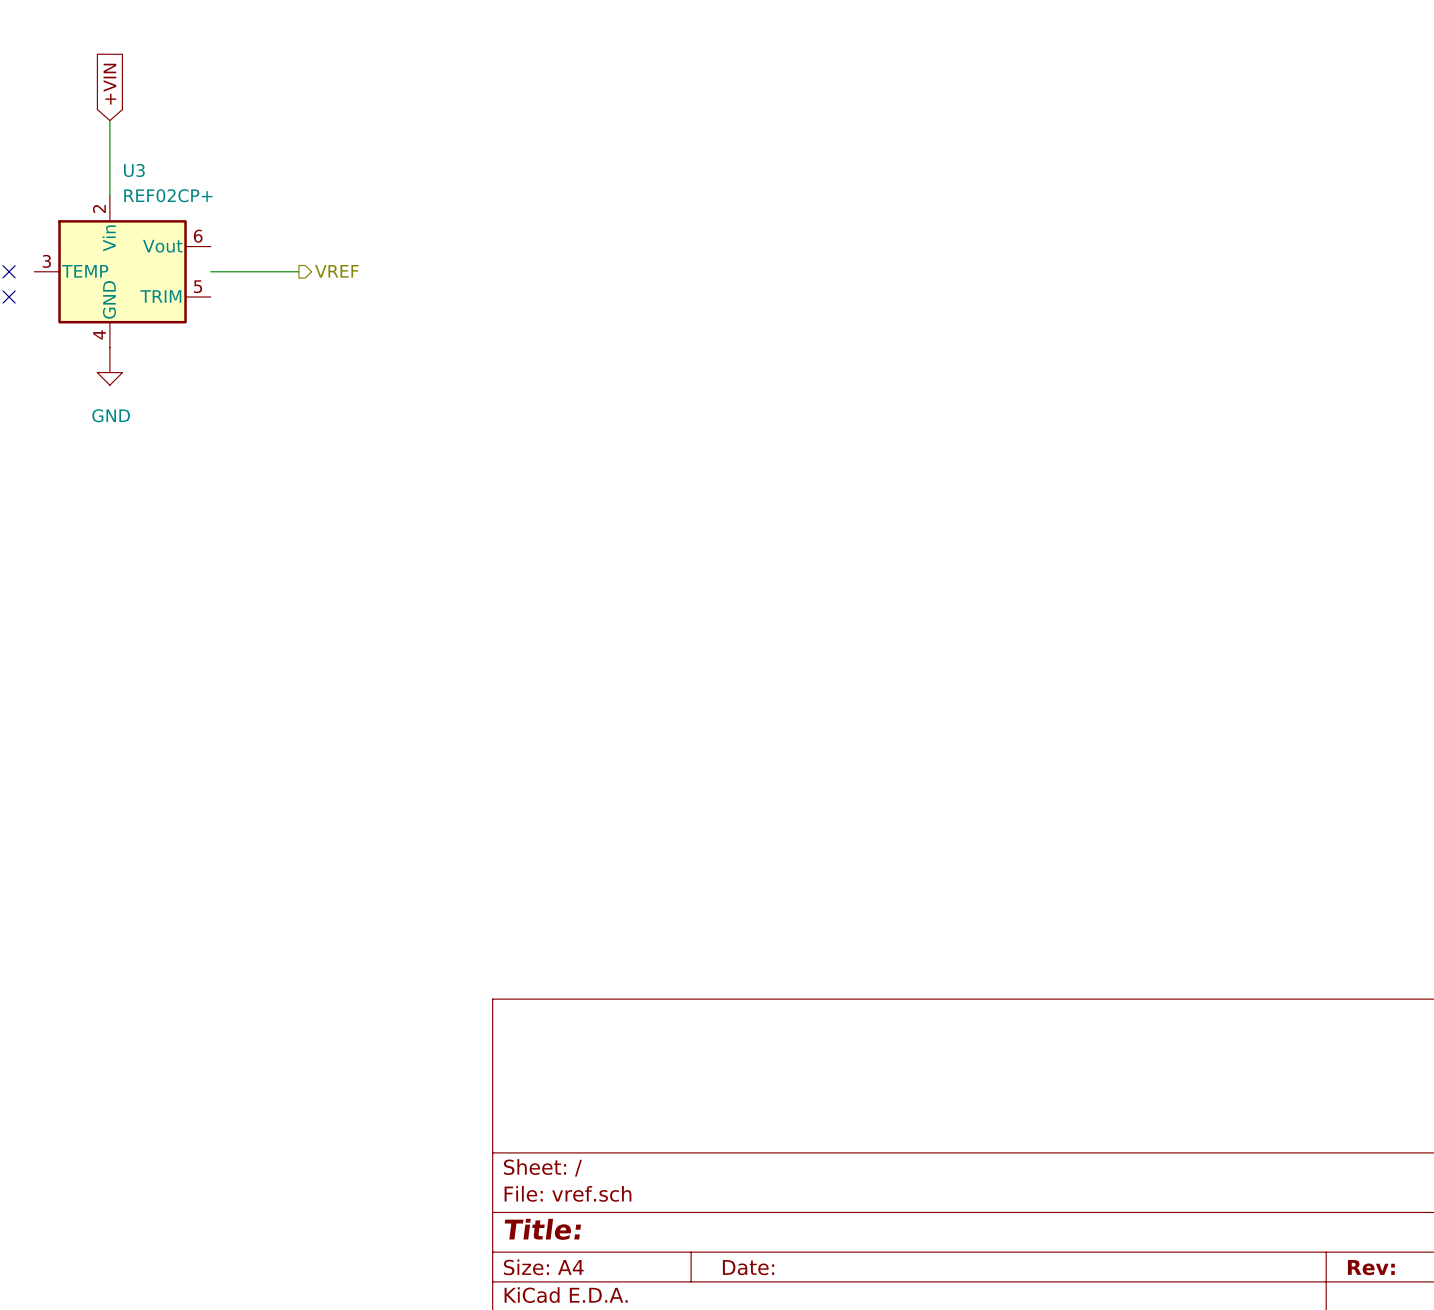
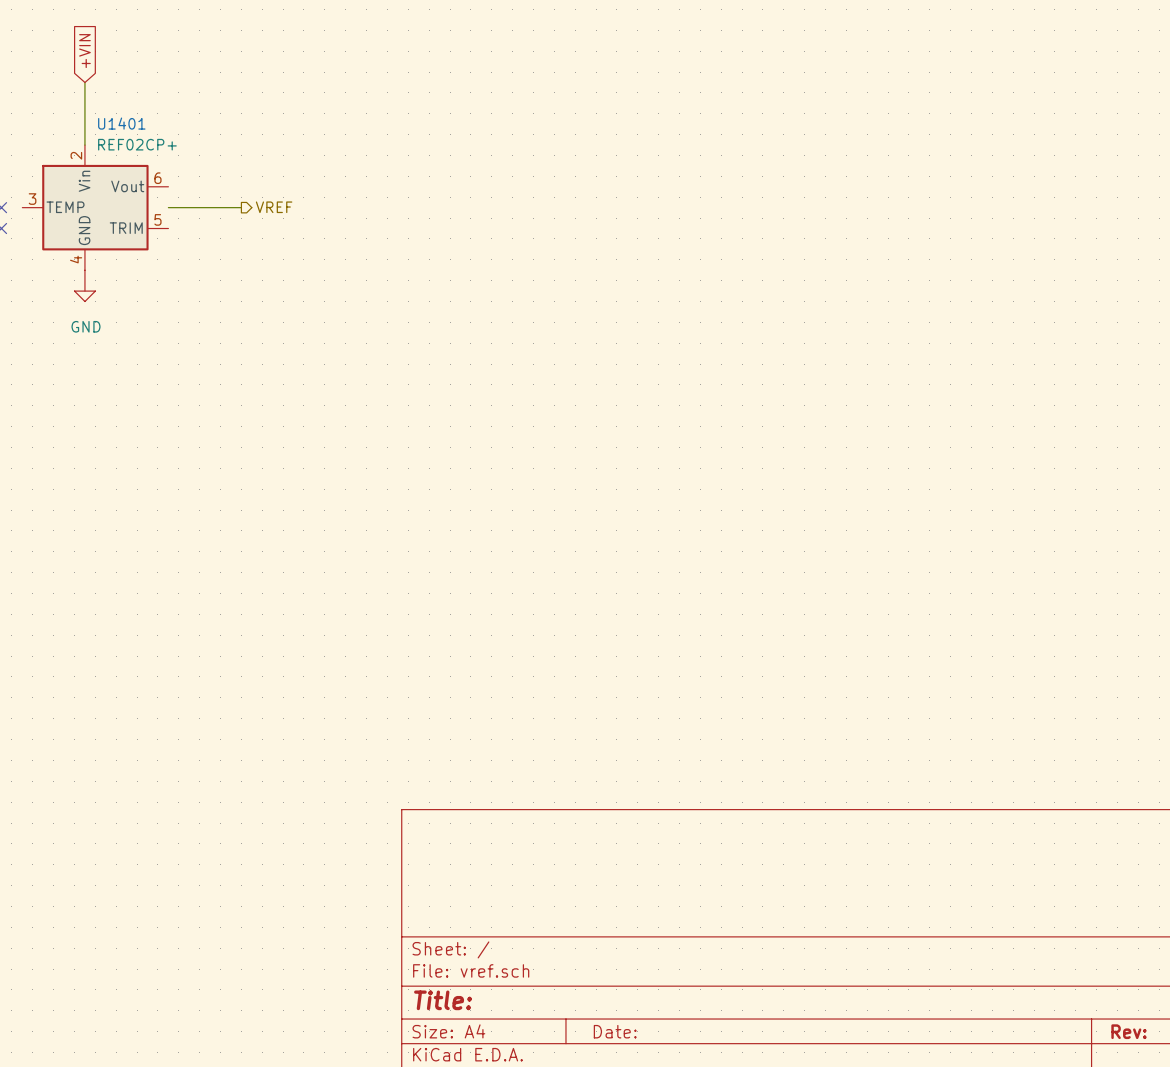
U3 name: U3 (134, 170) -> U1401 (121, 123)

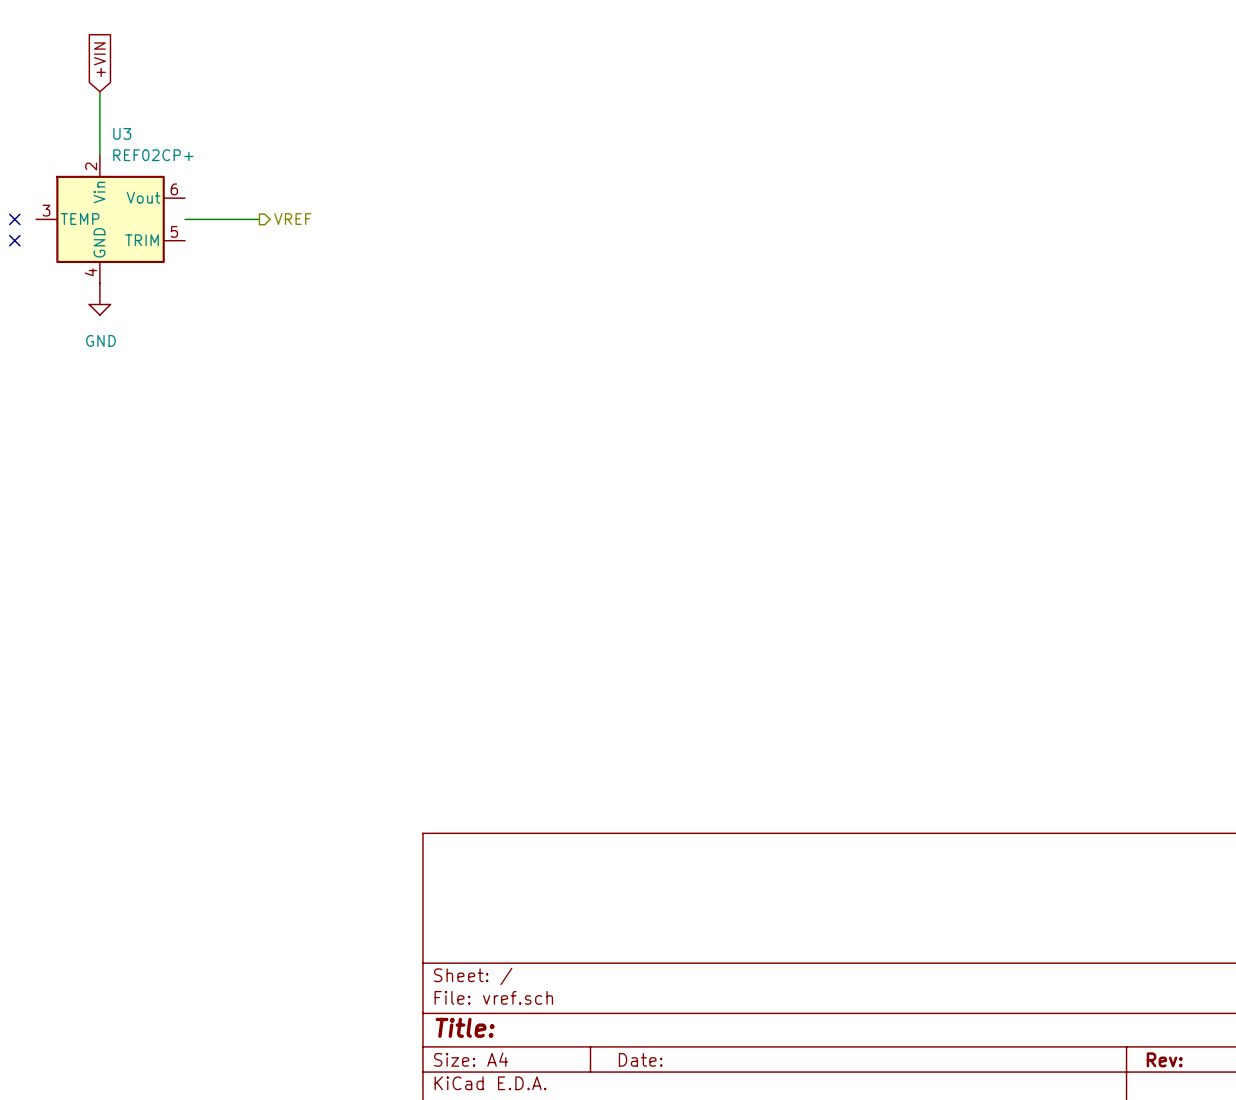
U1401 name: U1401 (121, 123) -> U3 (122, 133)

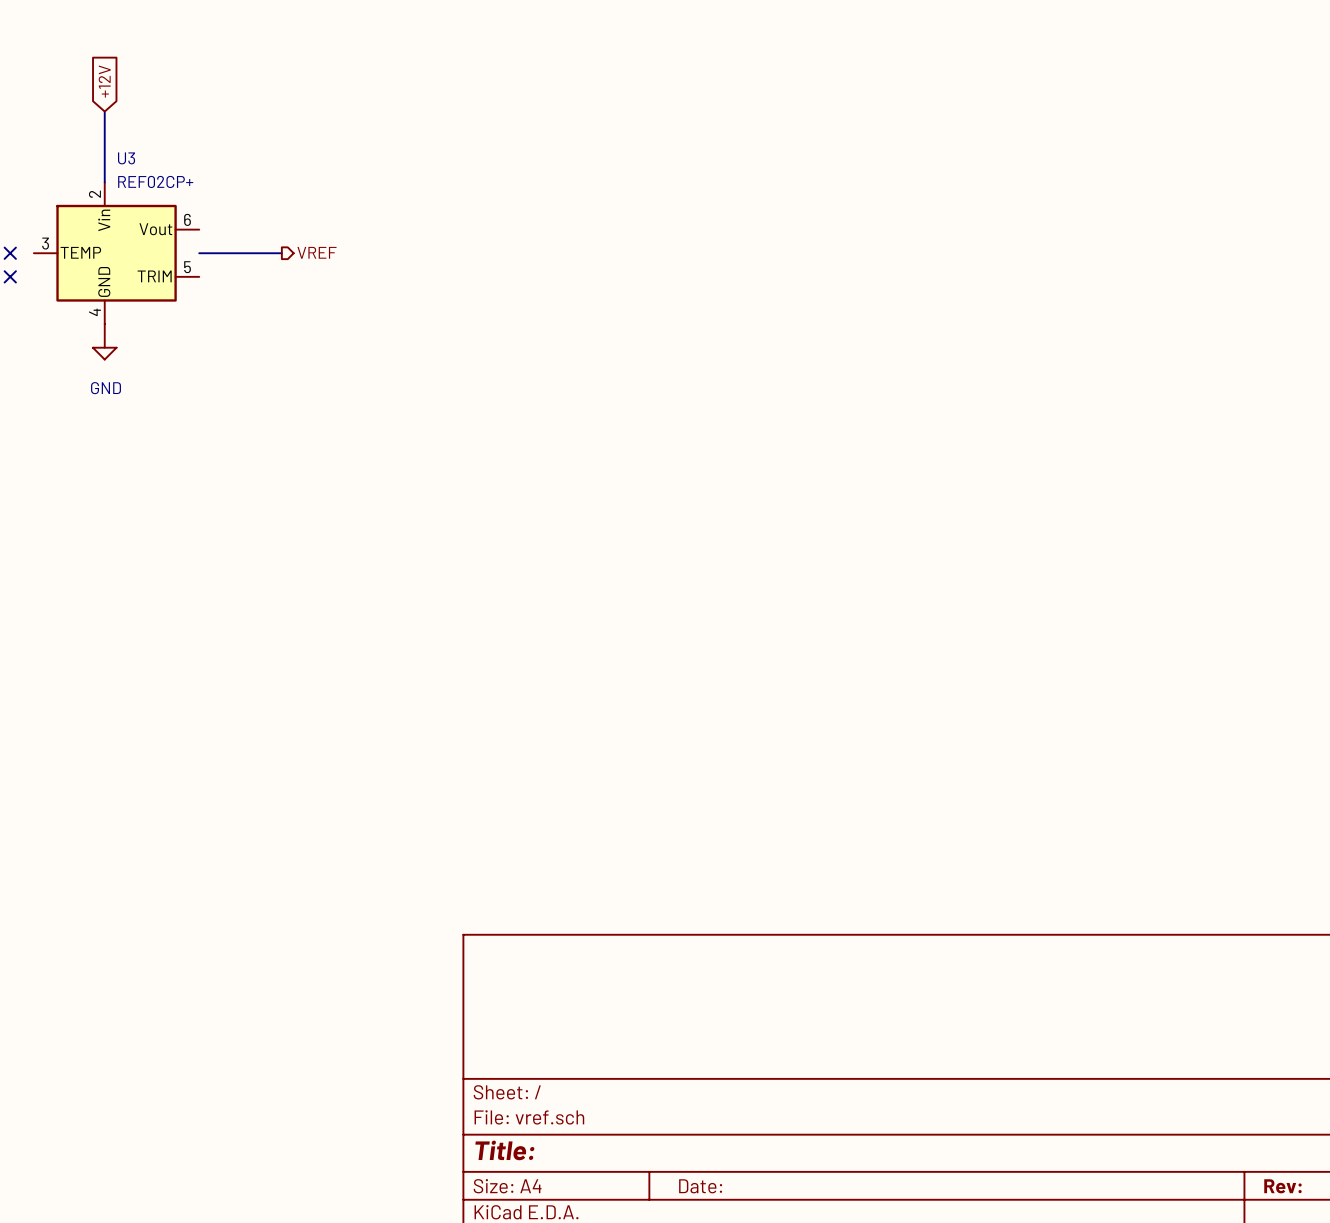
global label: +VIN (99, 59) -> +12V (104, 81)

